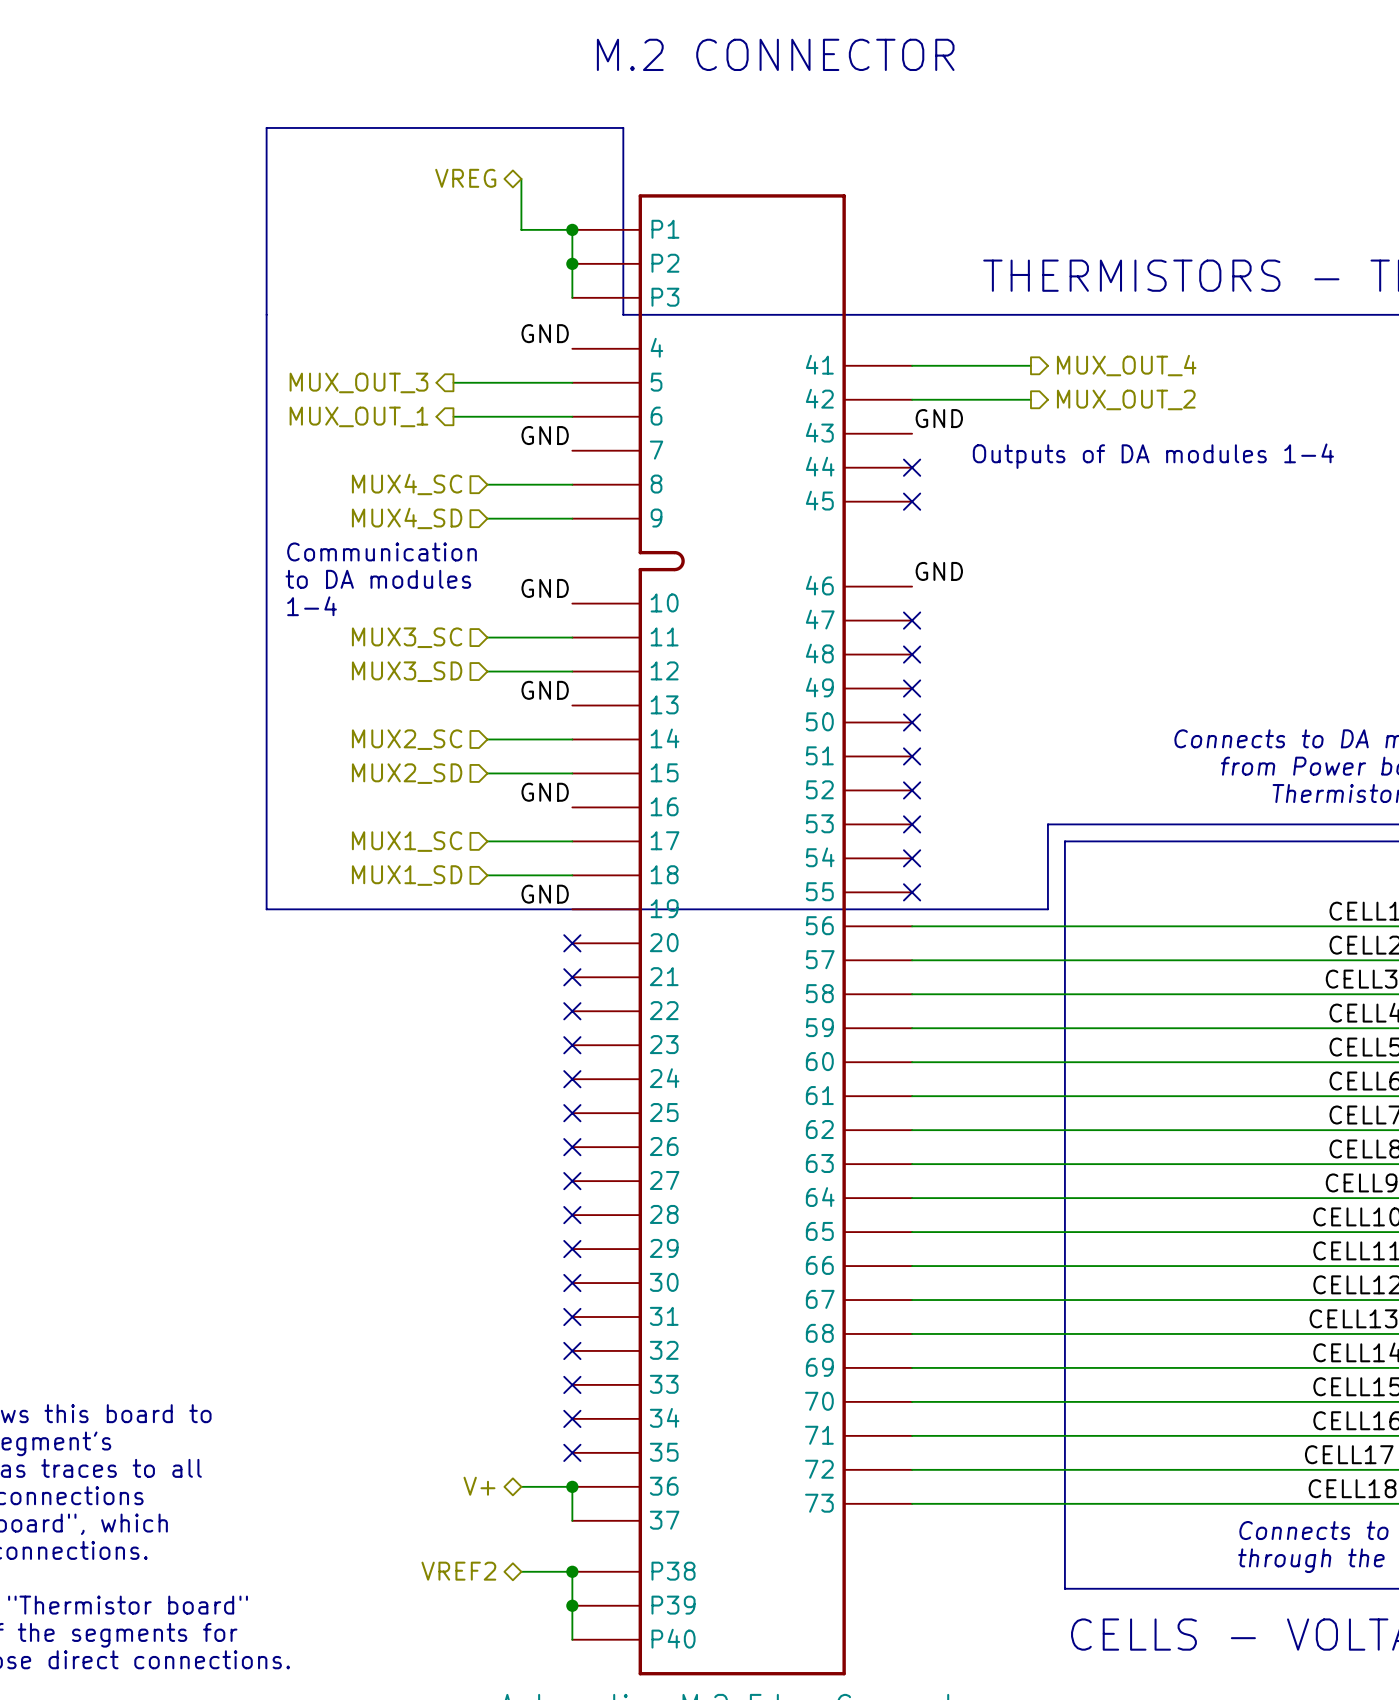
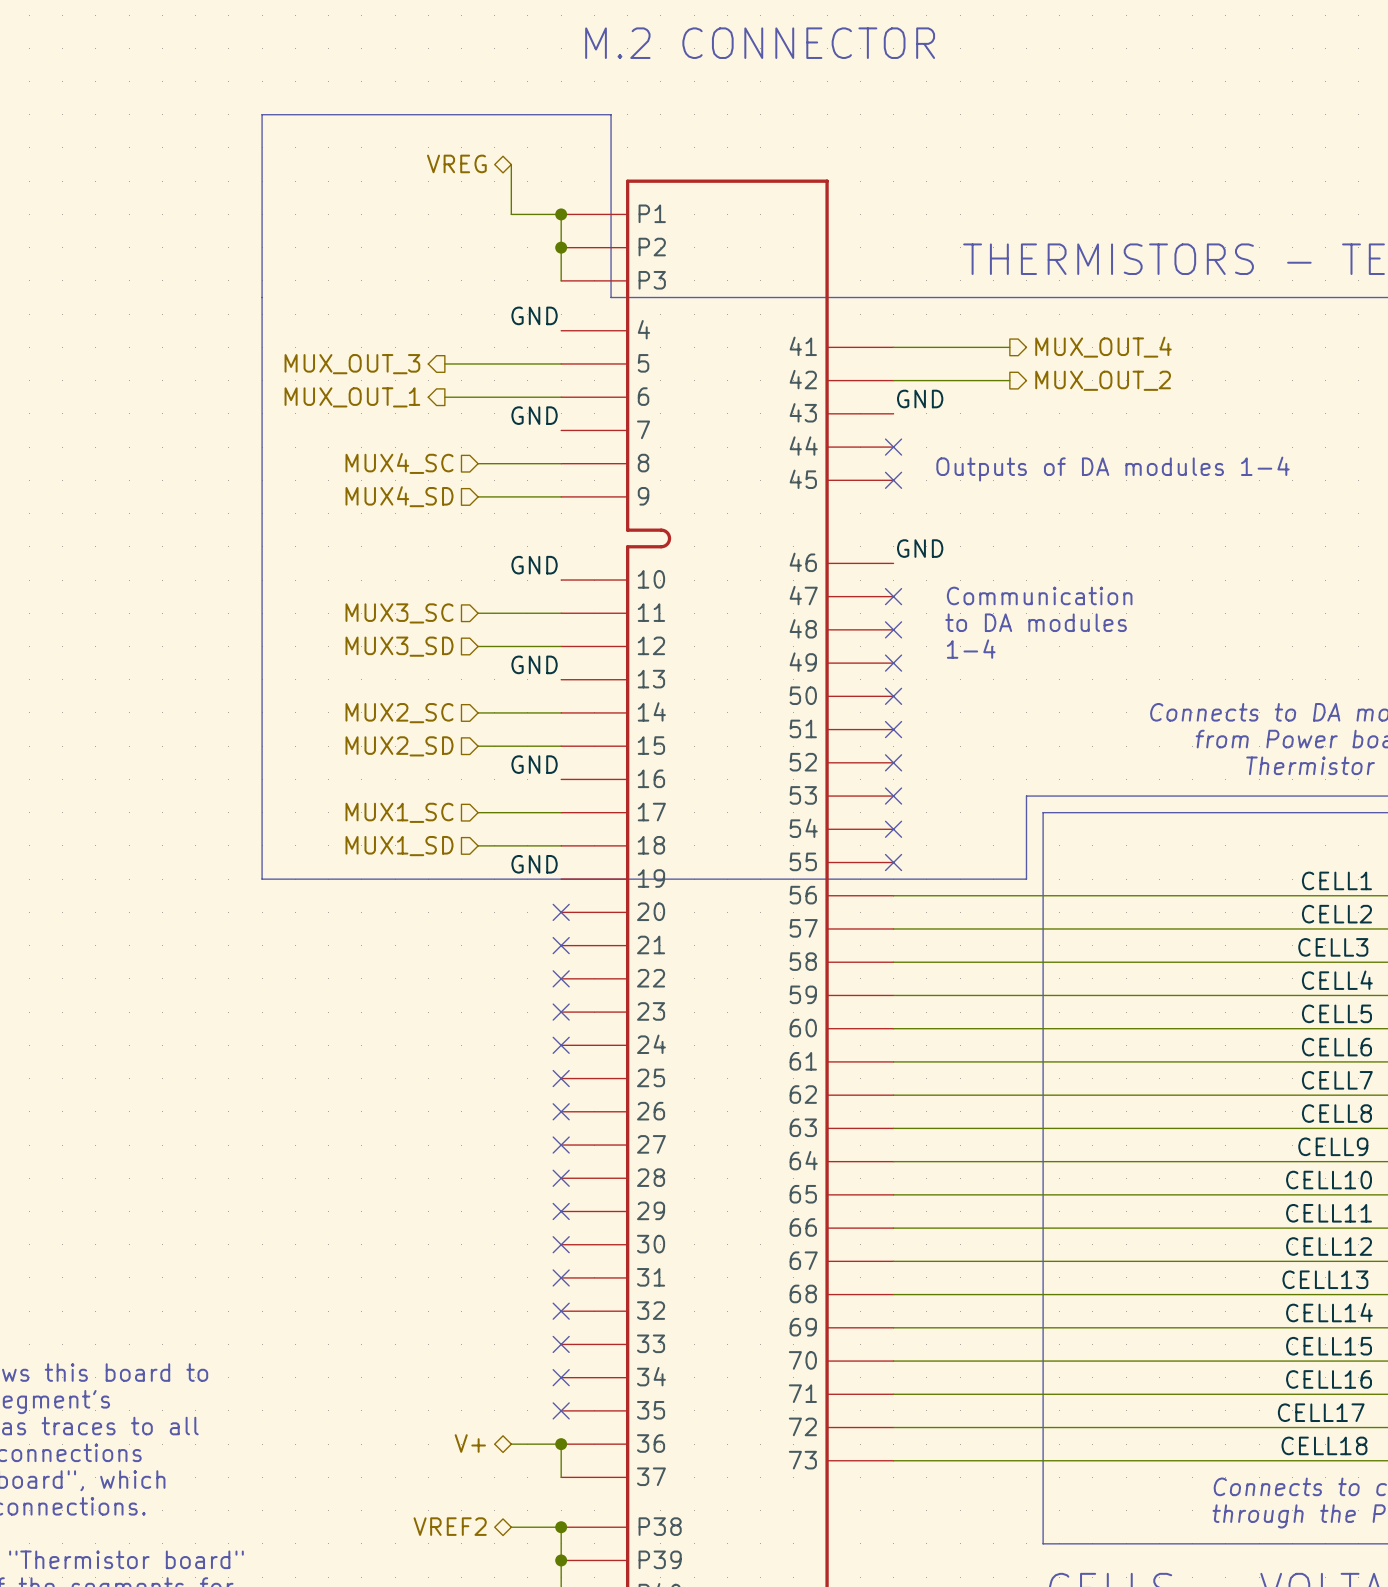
text position: Outputs of DA modules 1-4 (1153, 456) -> Outputs of DA modules 1-4 (1113, 469)
text: Communication (382, 551) -> none
text: to DA modules (378, 579) -> none
text: 1-4 (312, 606) -> none
text: none -> Communication (1039, 595)
text: none -> to DA modules (1036, 622)
text: none -> 1-4 (971, 649)

